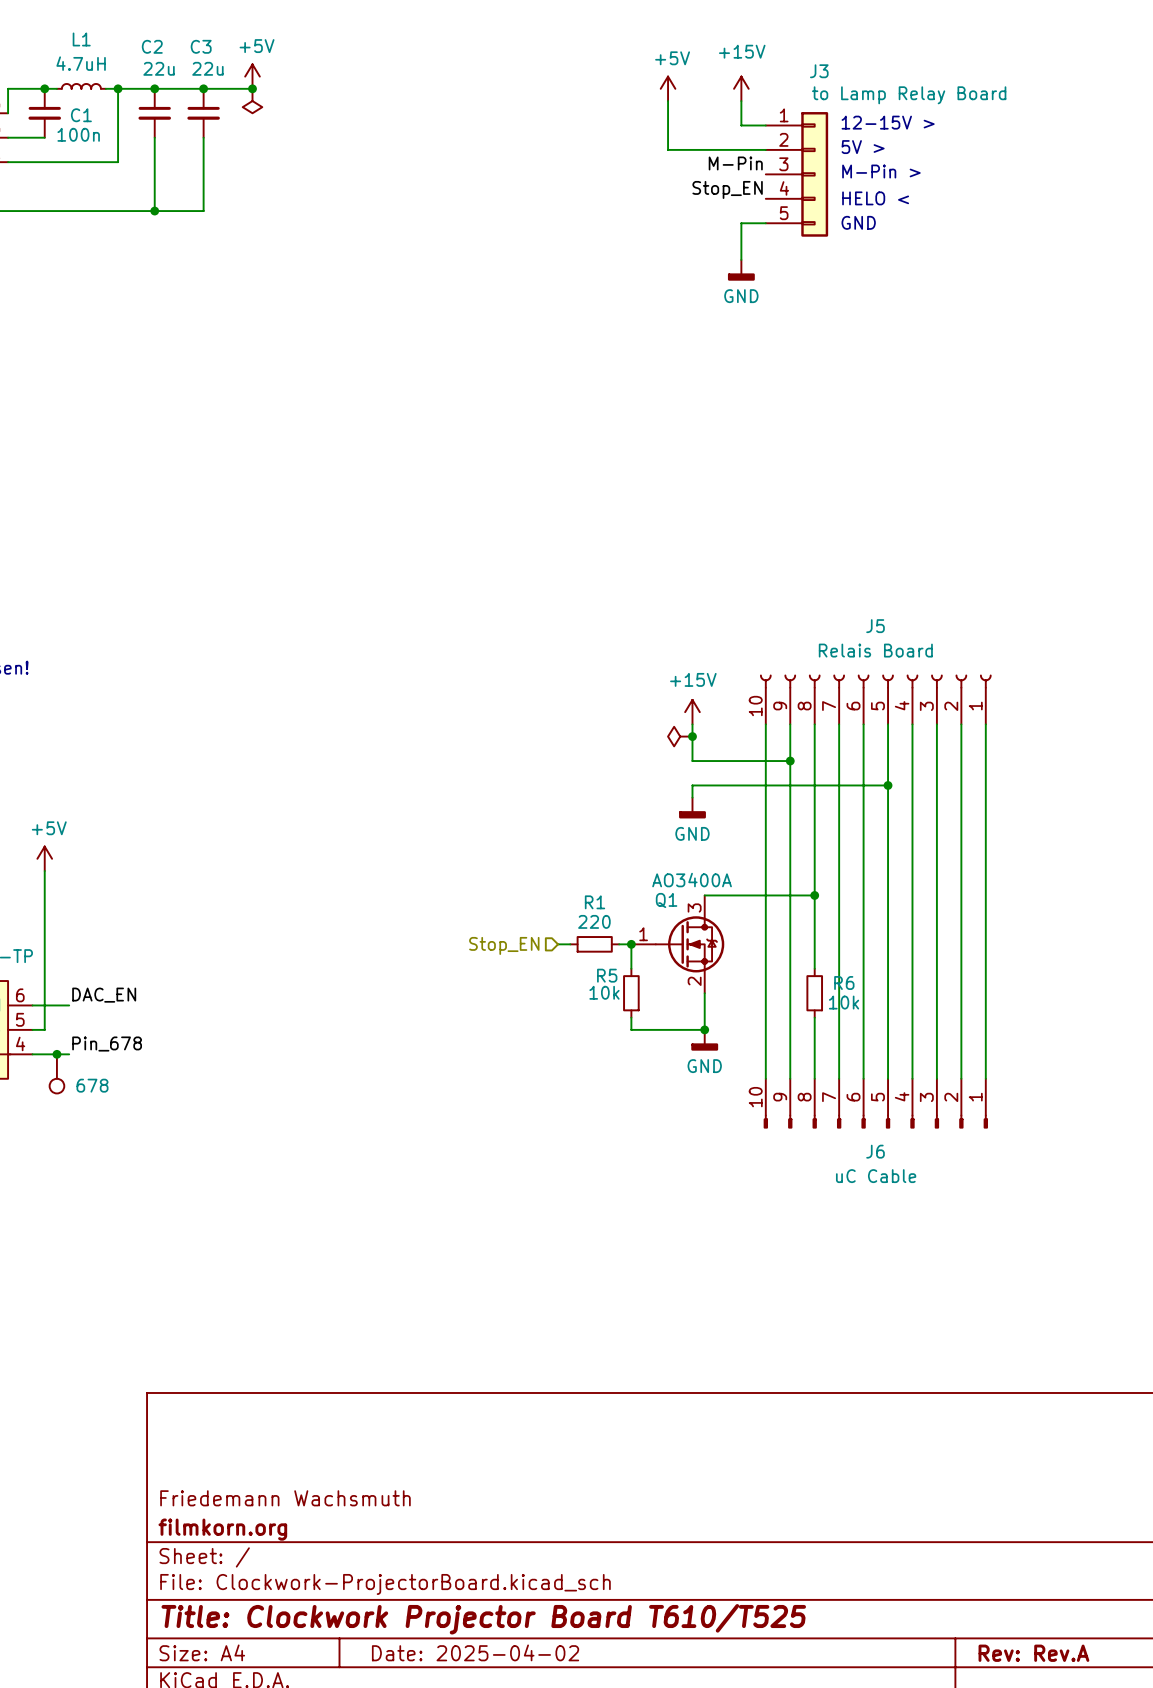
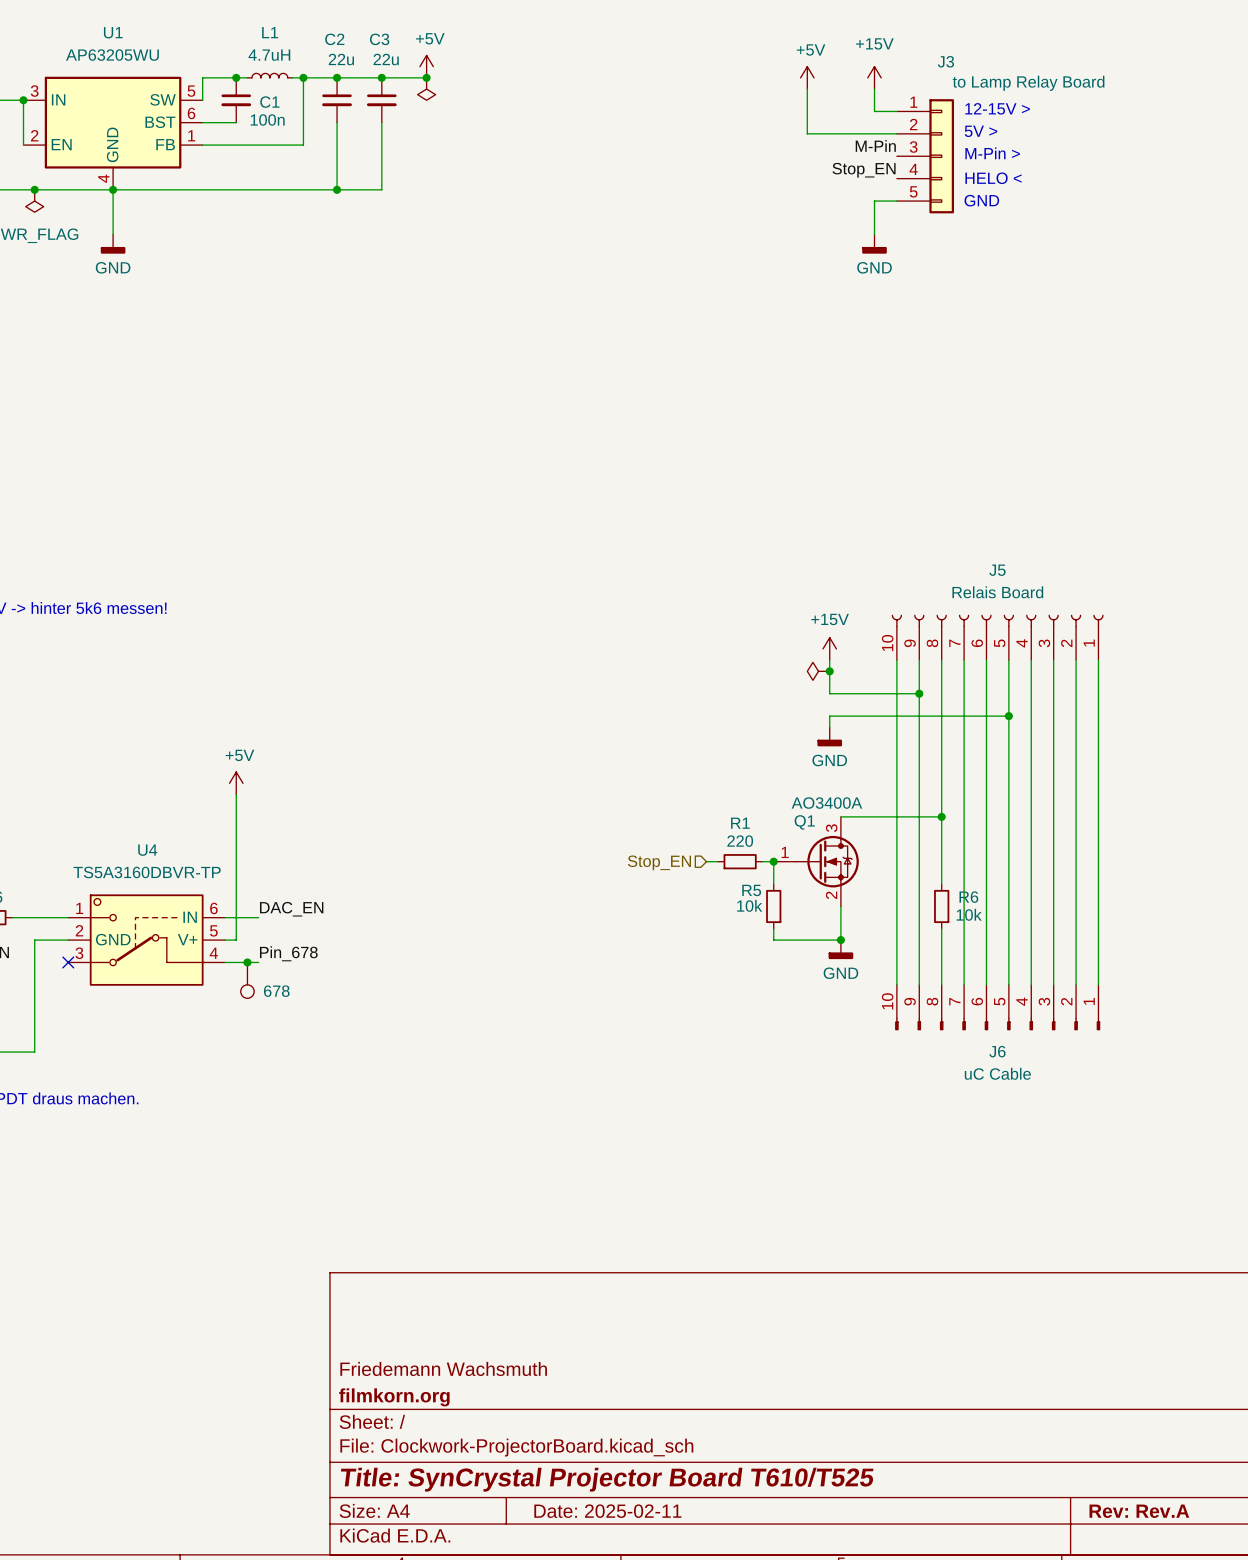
title block: Title: Clockwork Projector Board T610/T525 (483, 1619) -> Title: SynCrystal Projector Board T610/T525 (607, 1479)
title block: Date: 2025-04-02 (475, 1652) -> Date: 2025-02-11 (607, 1511)

